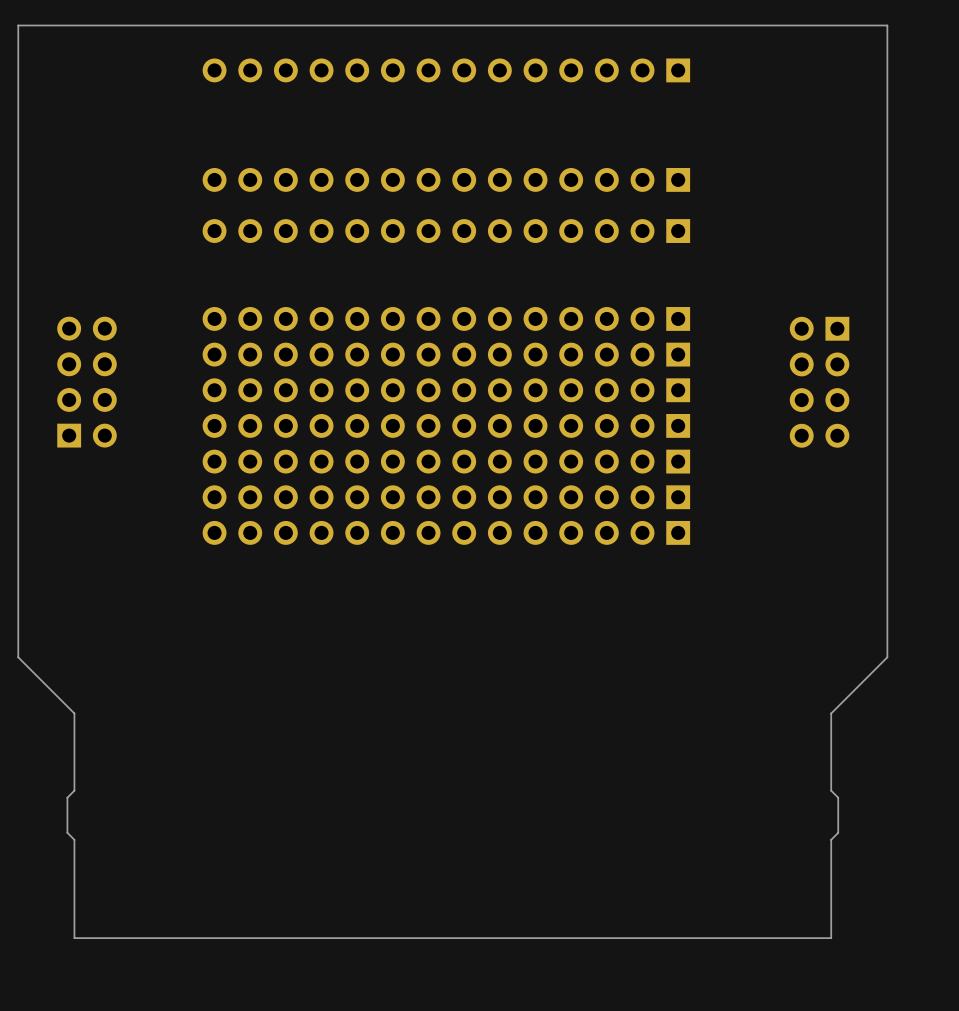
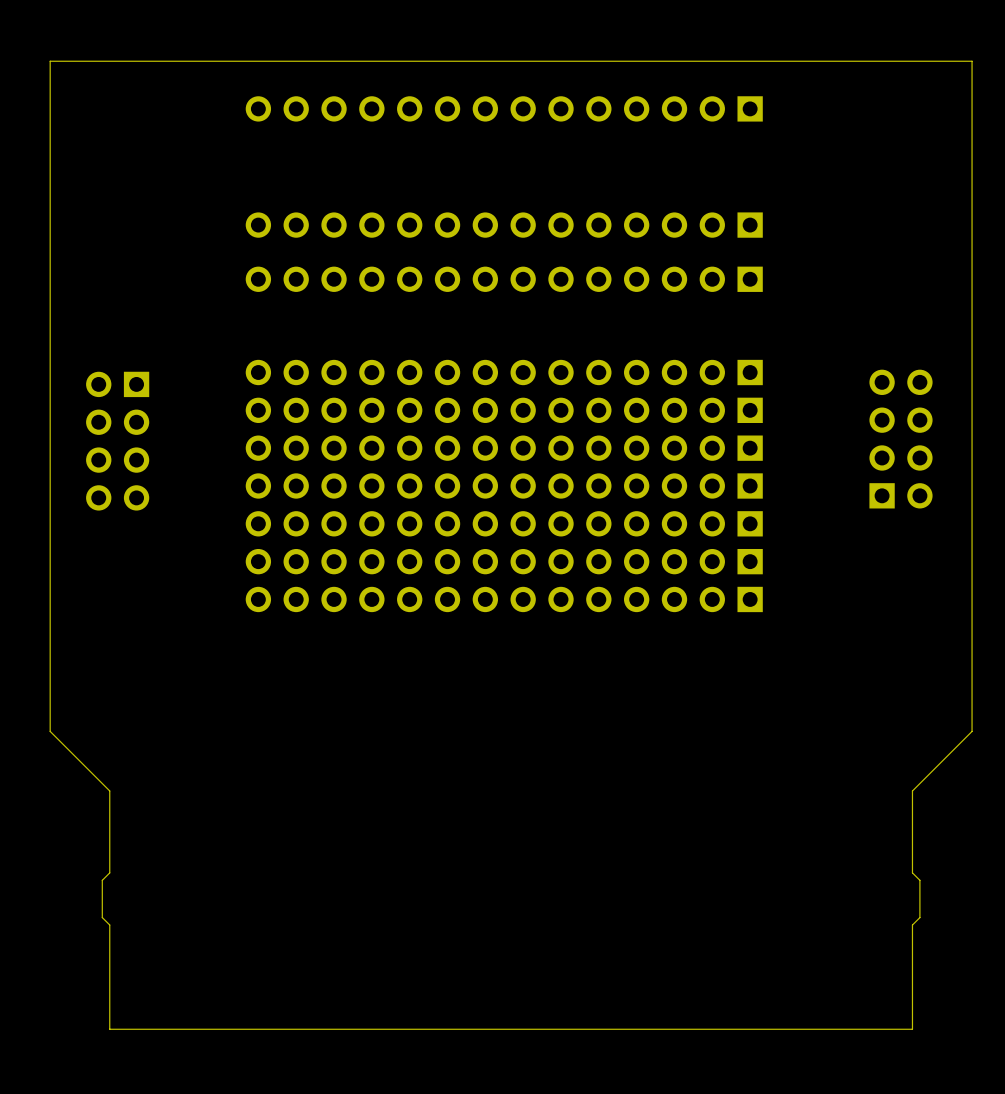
part rotation: 0° (87, 382) -> 180° (117, 441)
part rotation: 0° (819, 382) -> 180° (901, 439)

